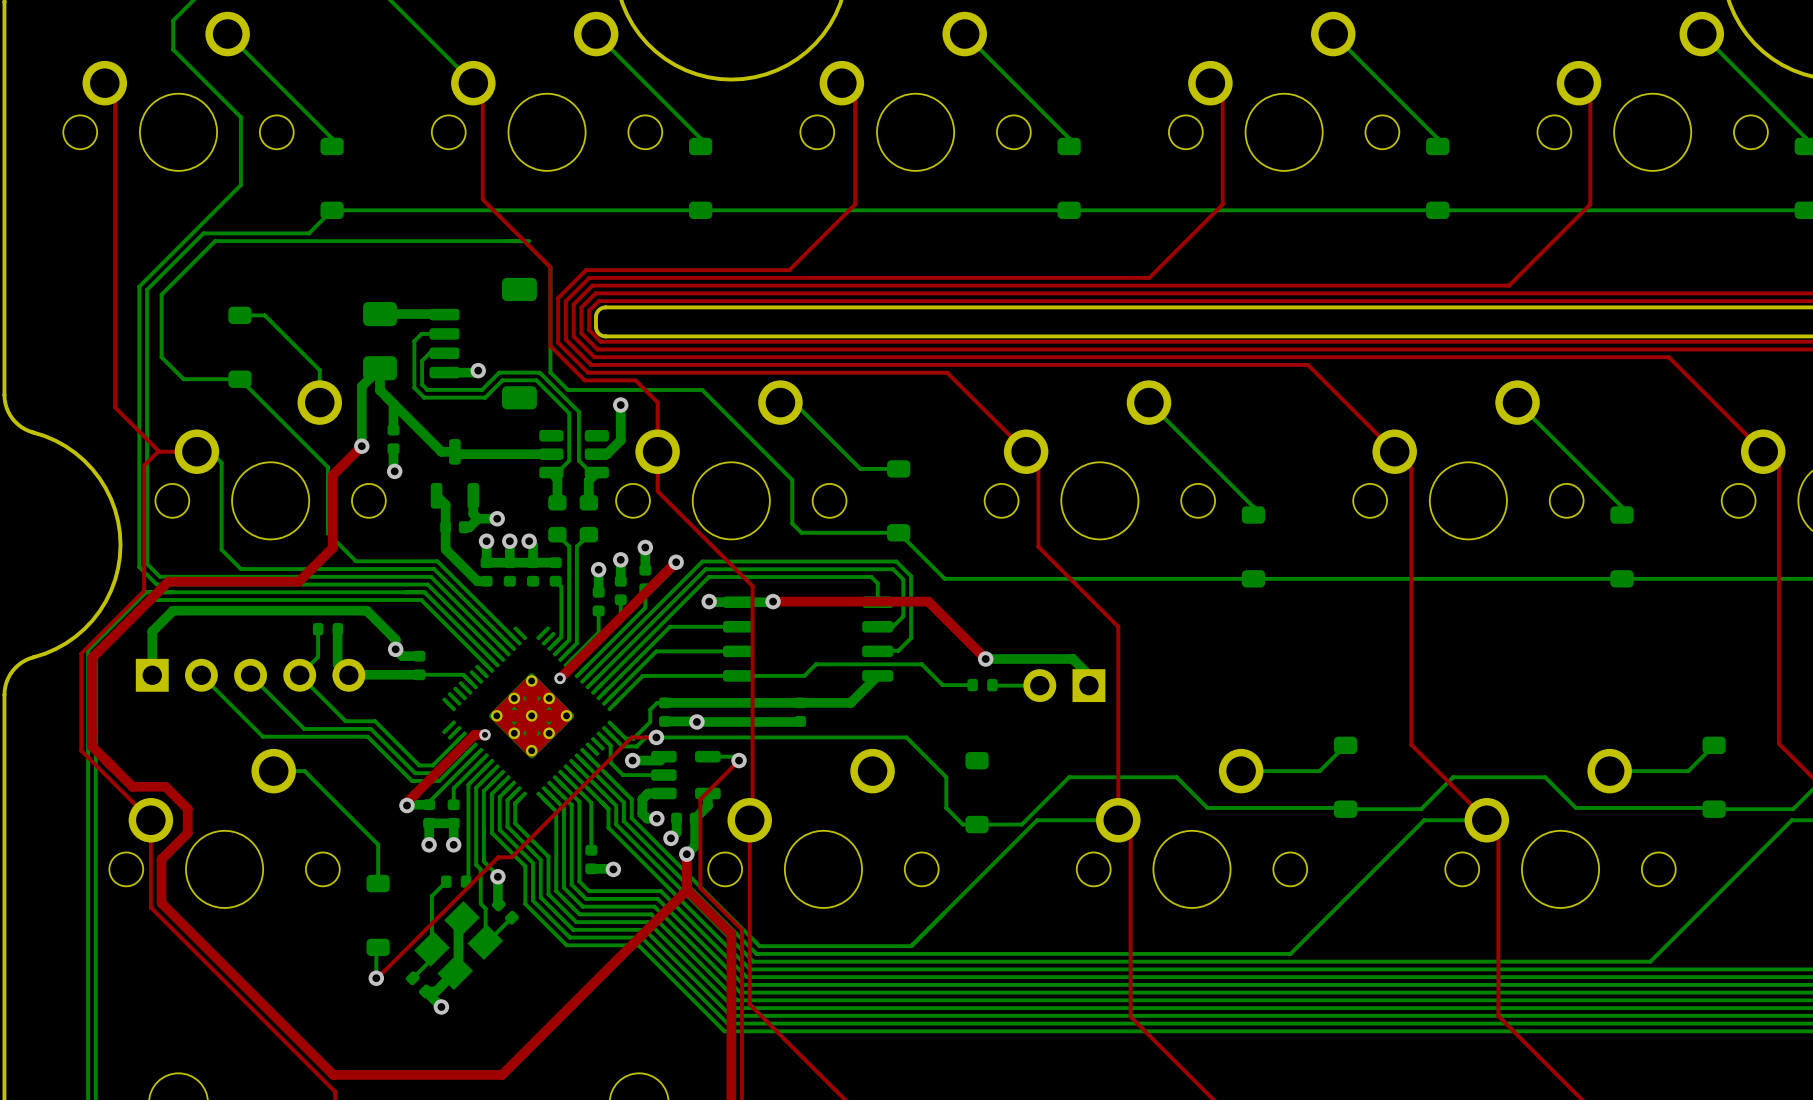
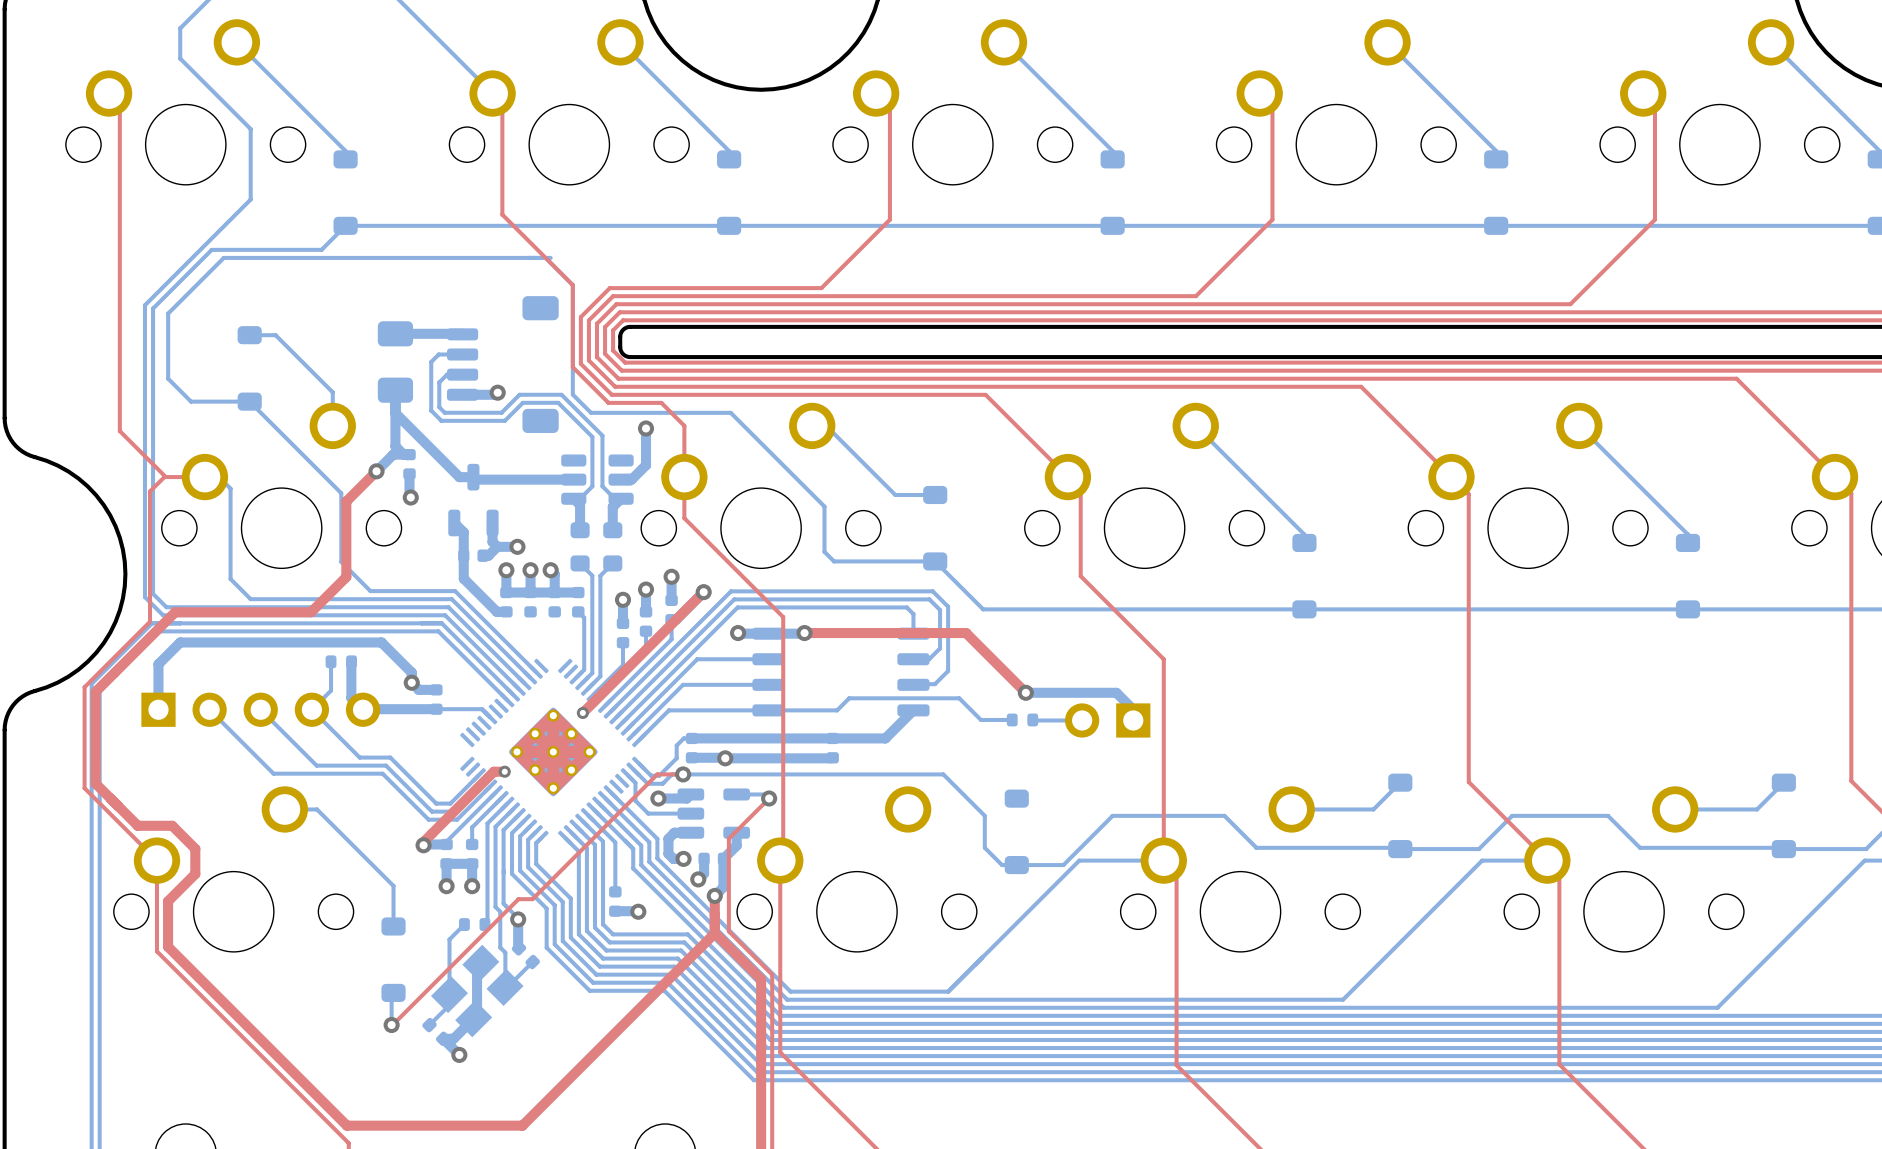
bottom track: (379, 368) (361, 386) (361, 446) -> none
bottom track: none -> (395, 413) (395, 446) (403, 454)
bottom track: (393, 403) (393, 430) -> (376, 471) (393, 454) (409, 454)

